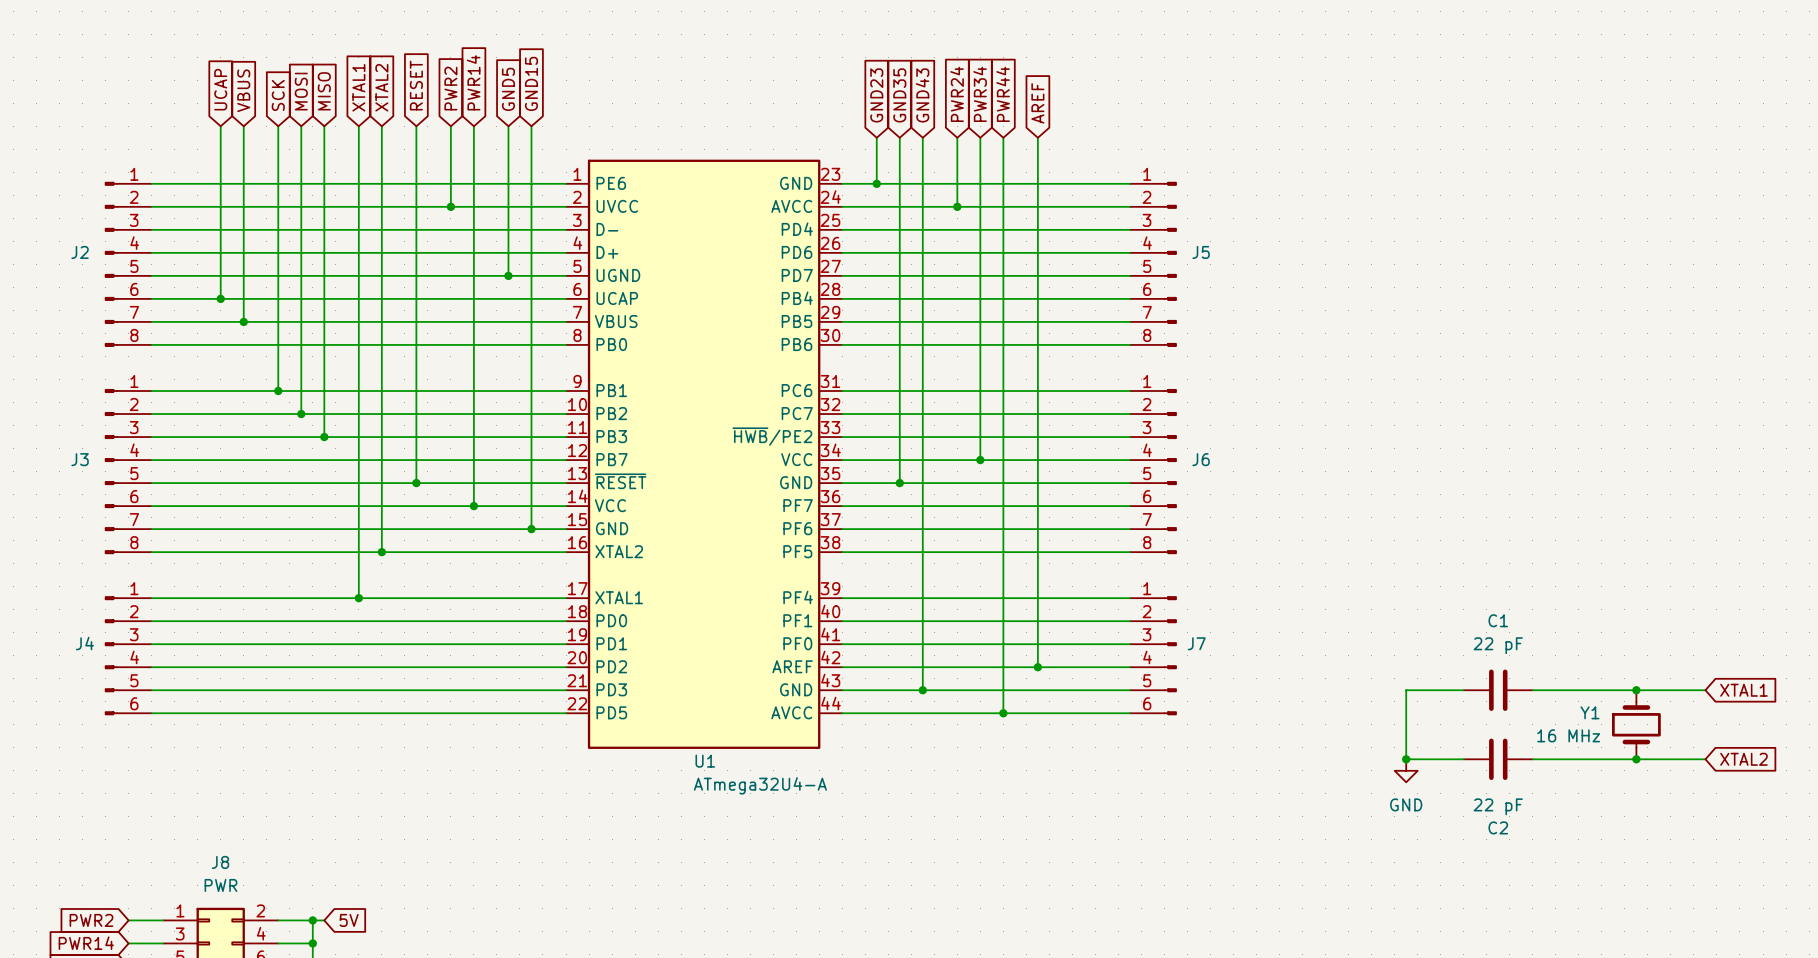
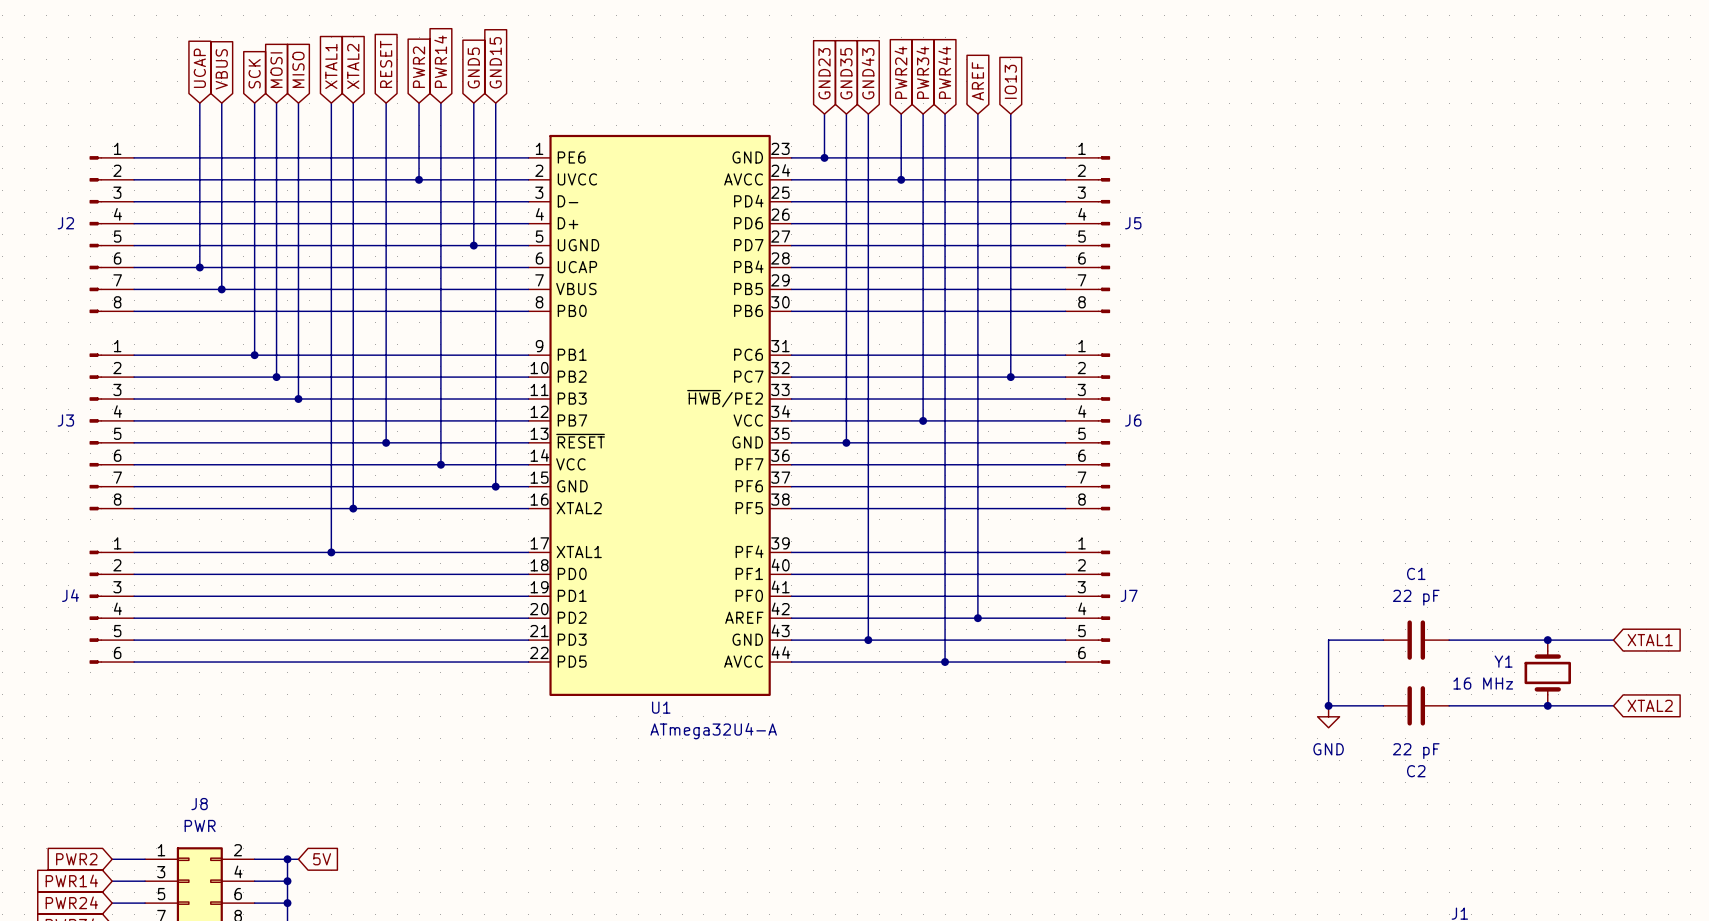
global label: none -> IO13 (1010, 81)
wire: none -> (1010, 114) (1010, 377)
junction: none -> (1010, 377)

